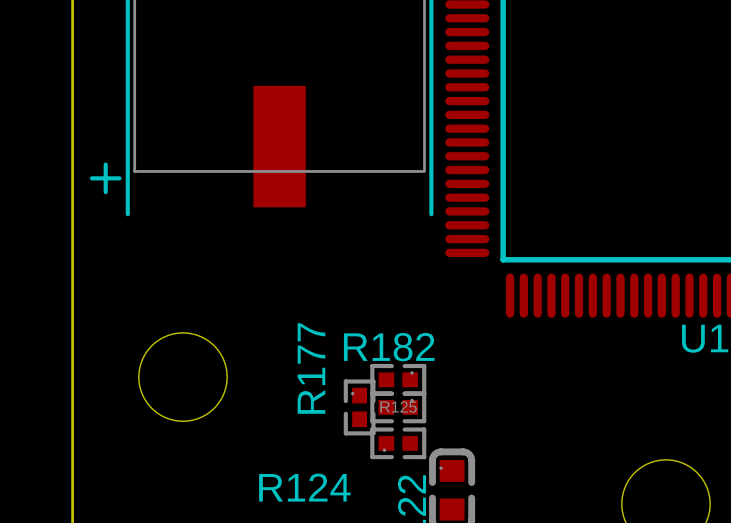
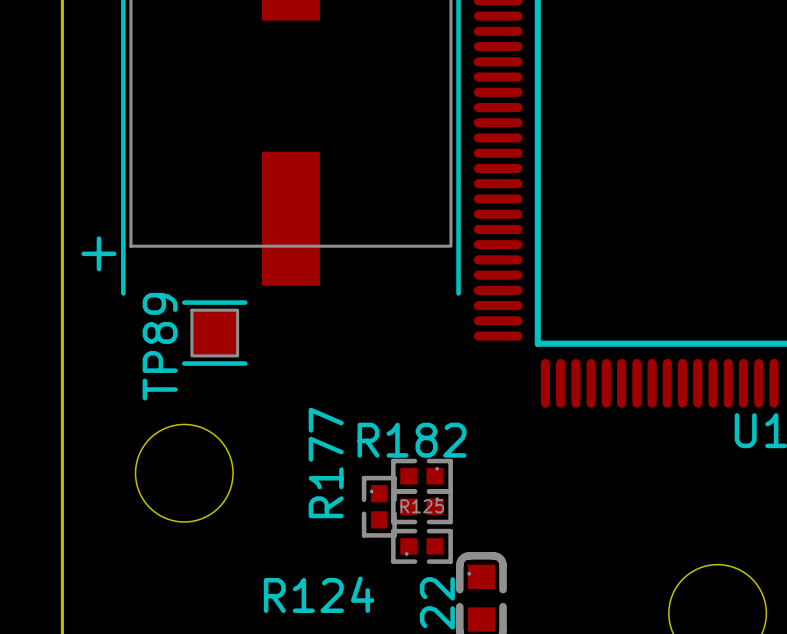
TP89: none -> (214, 333)

